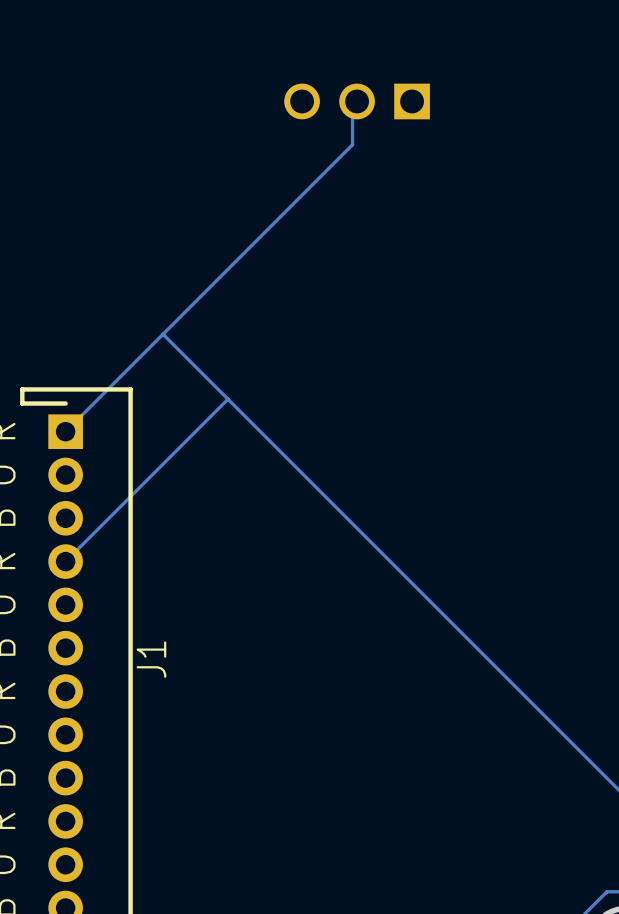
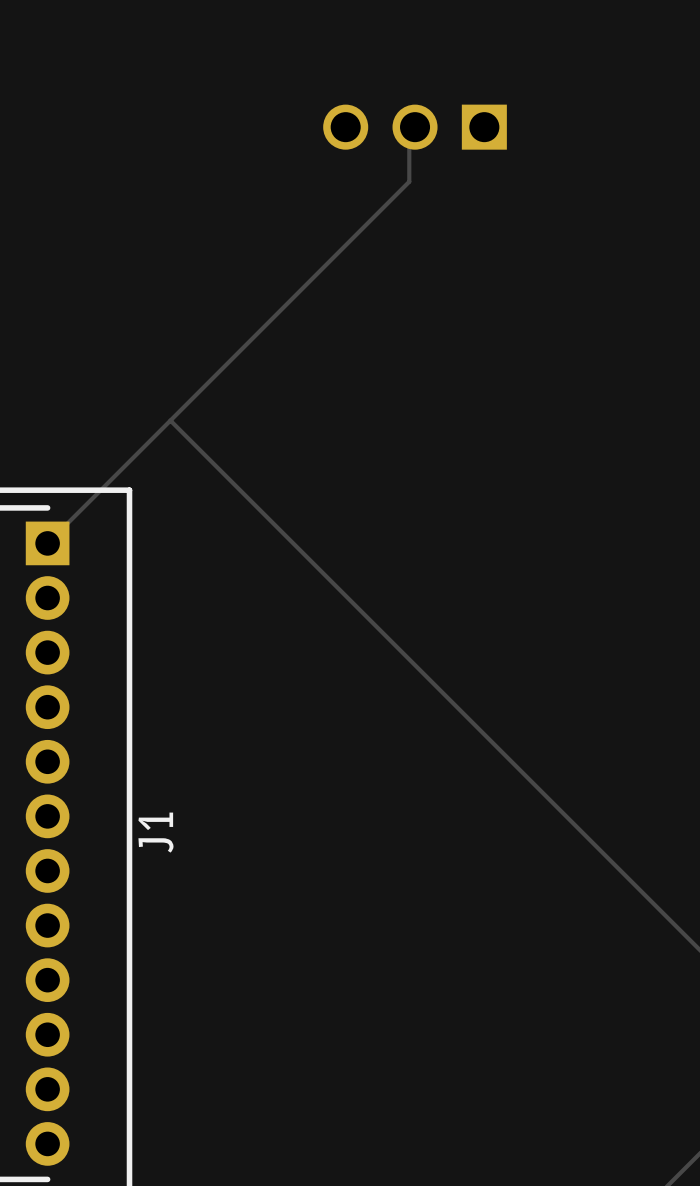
track: (228, 399) (65, 561) -> none

